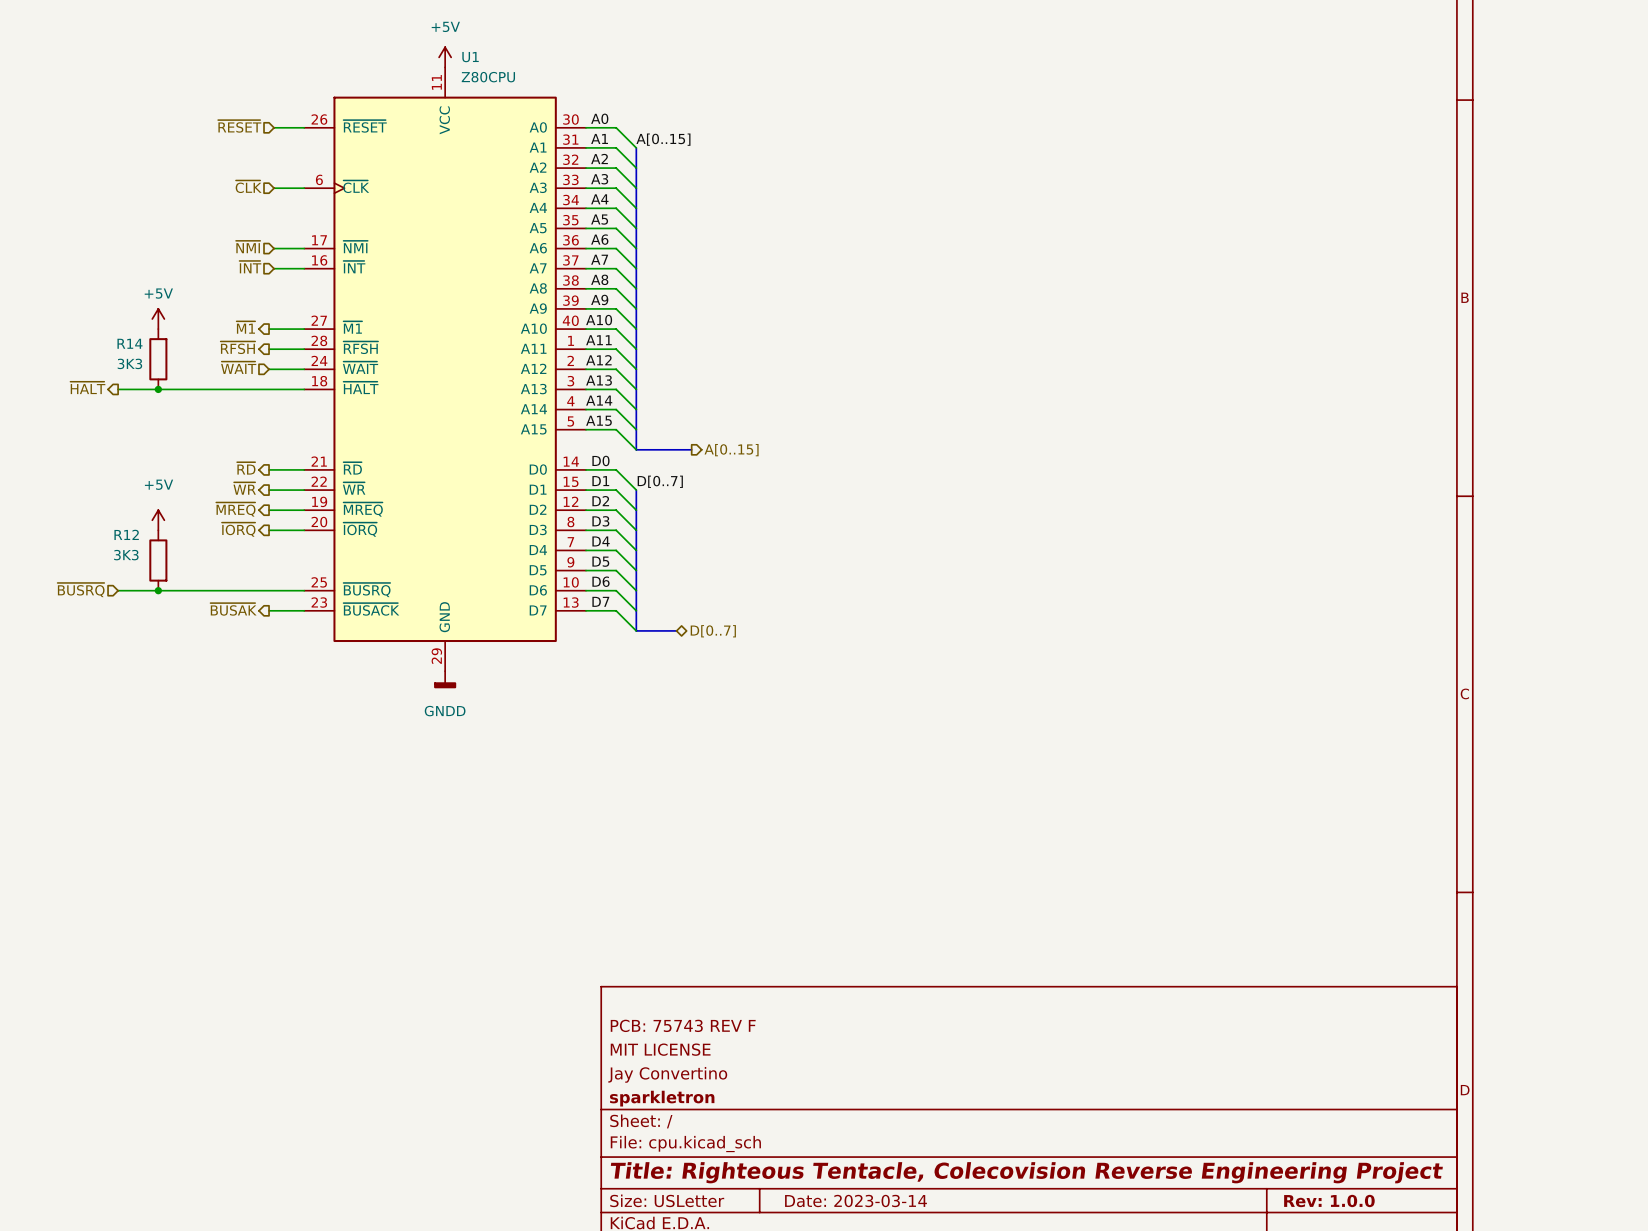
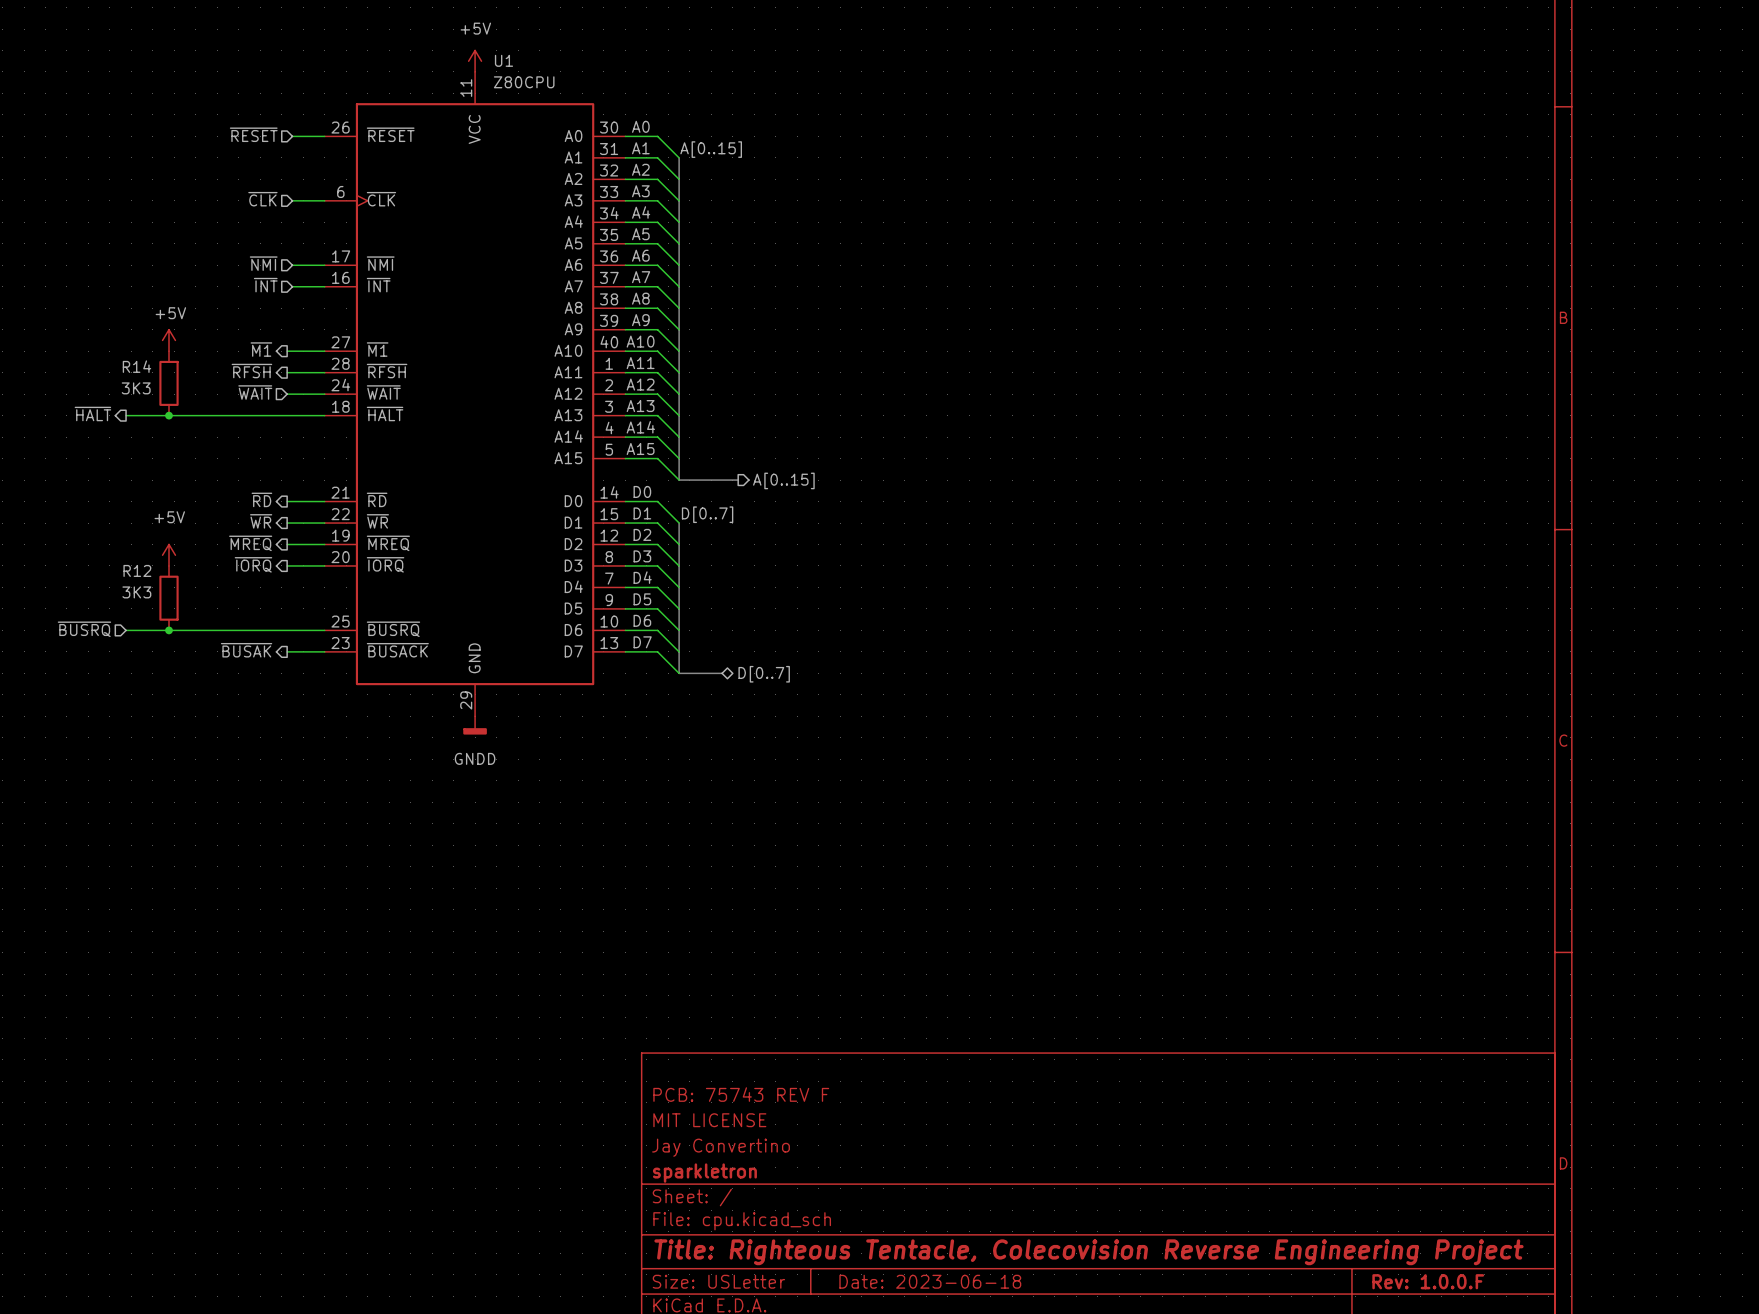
title block: Date: 2023-03-14 (855, 1200) -> Date: 2023-06-18 (930, 1281)
title block: Rev: 1.0.0 (1329, 1200) -> Rev: 1.0.0.F (1428, 1281)

